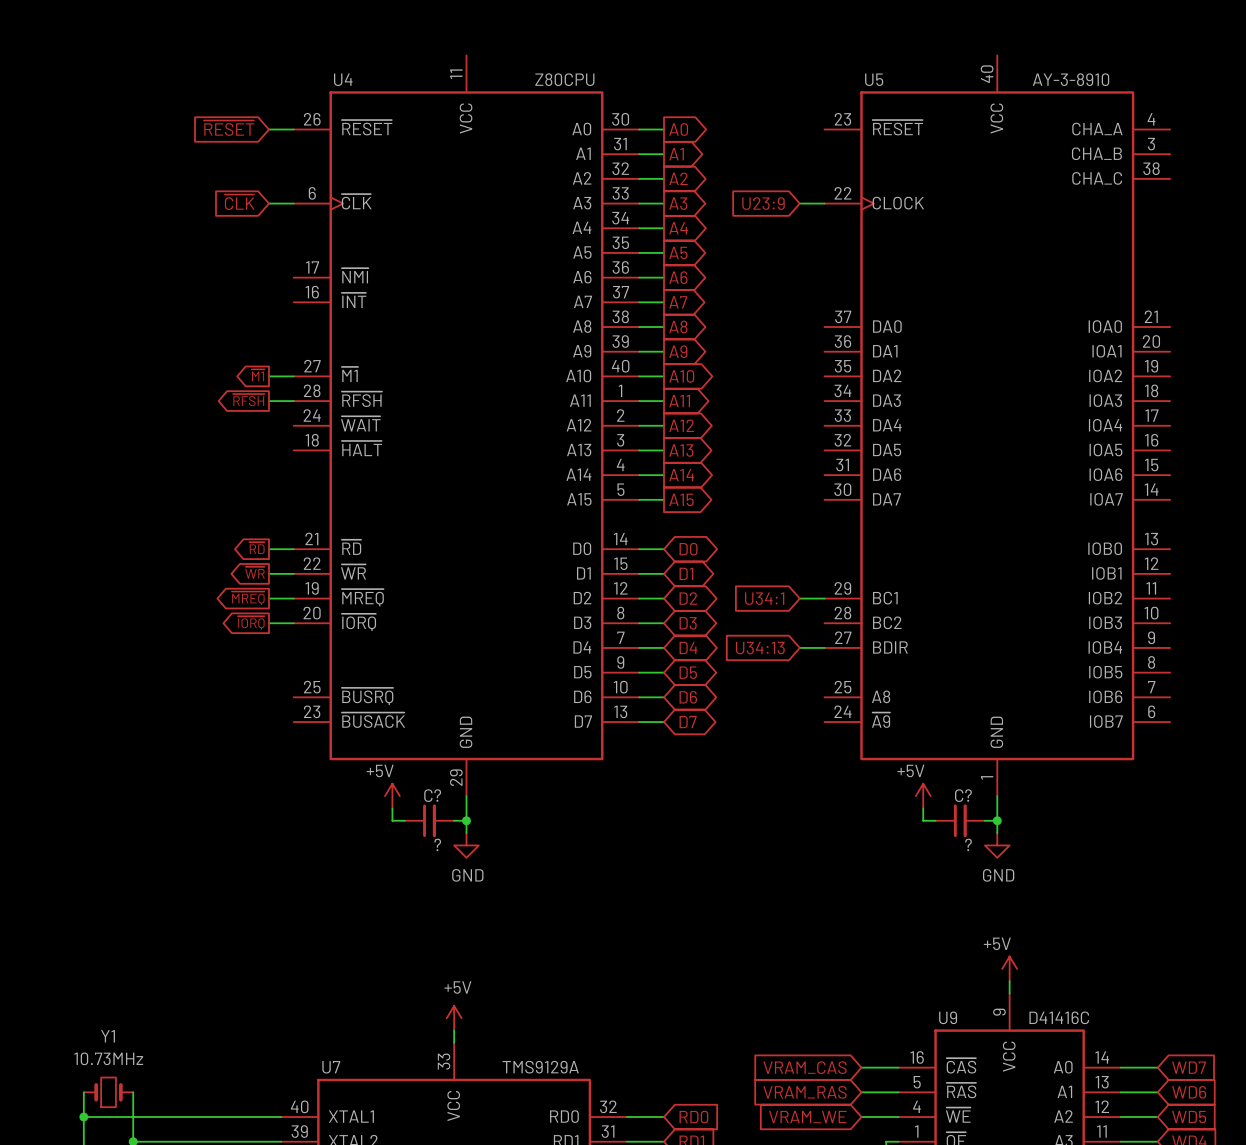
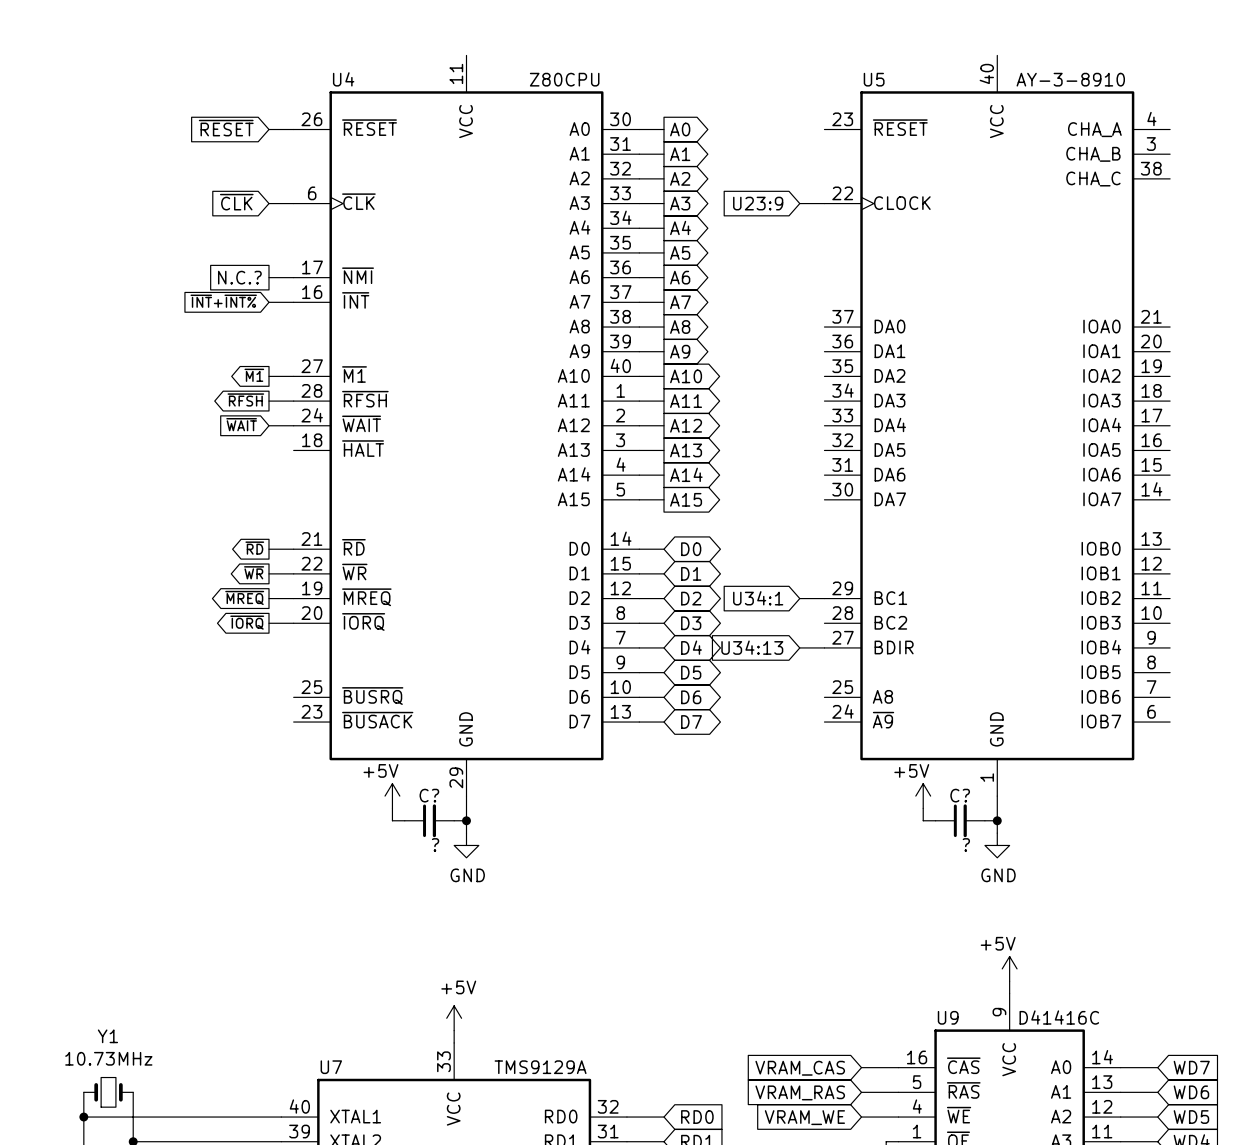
global label: none -> N.C.? (239, 277)
wire: none -> (268, 277) (293, 277)
global label: none -> ~{INT}+~{INT%} (223, 301)
wire: none -> (268, 302) (293, 302)
global label: none -> ~{WAIT} (241, 424)
wire: none -> (268, 425) (293, 425)

